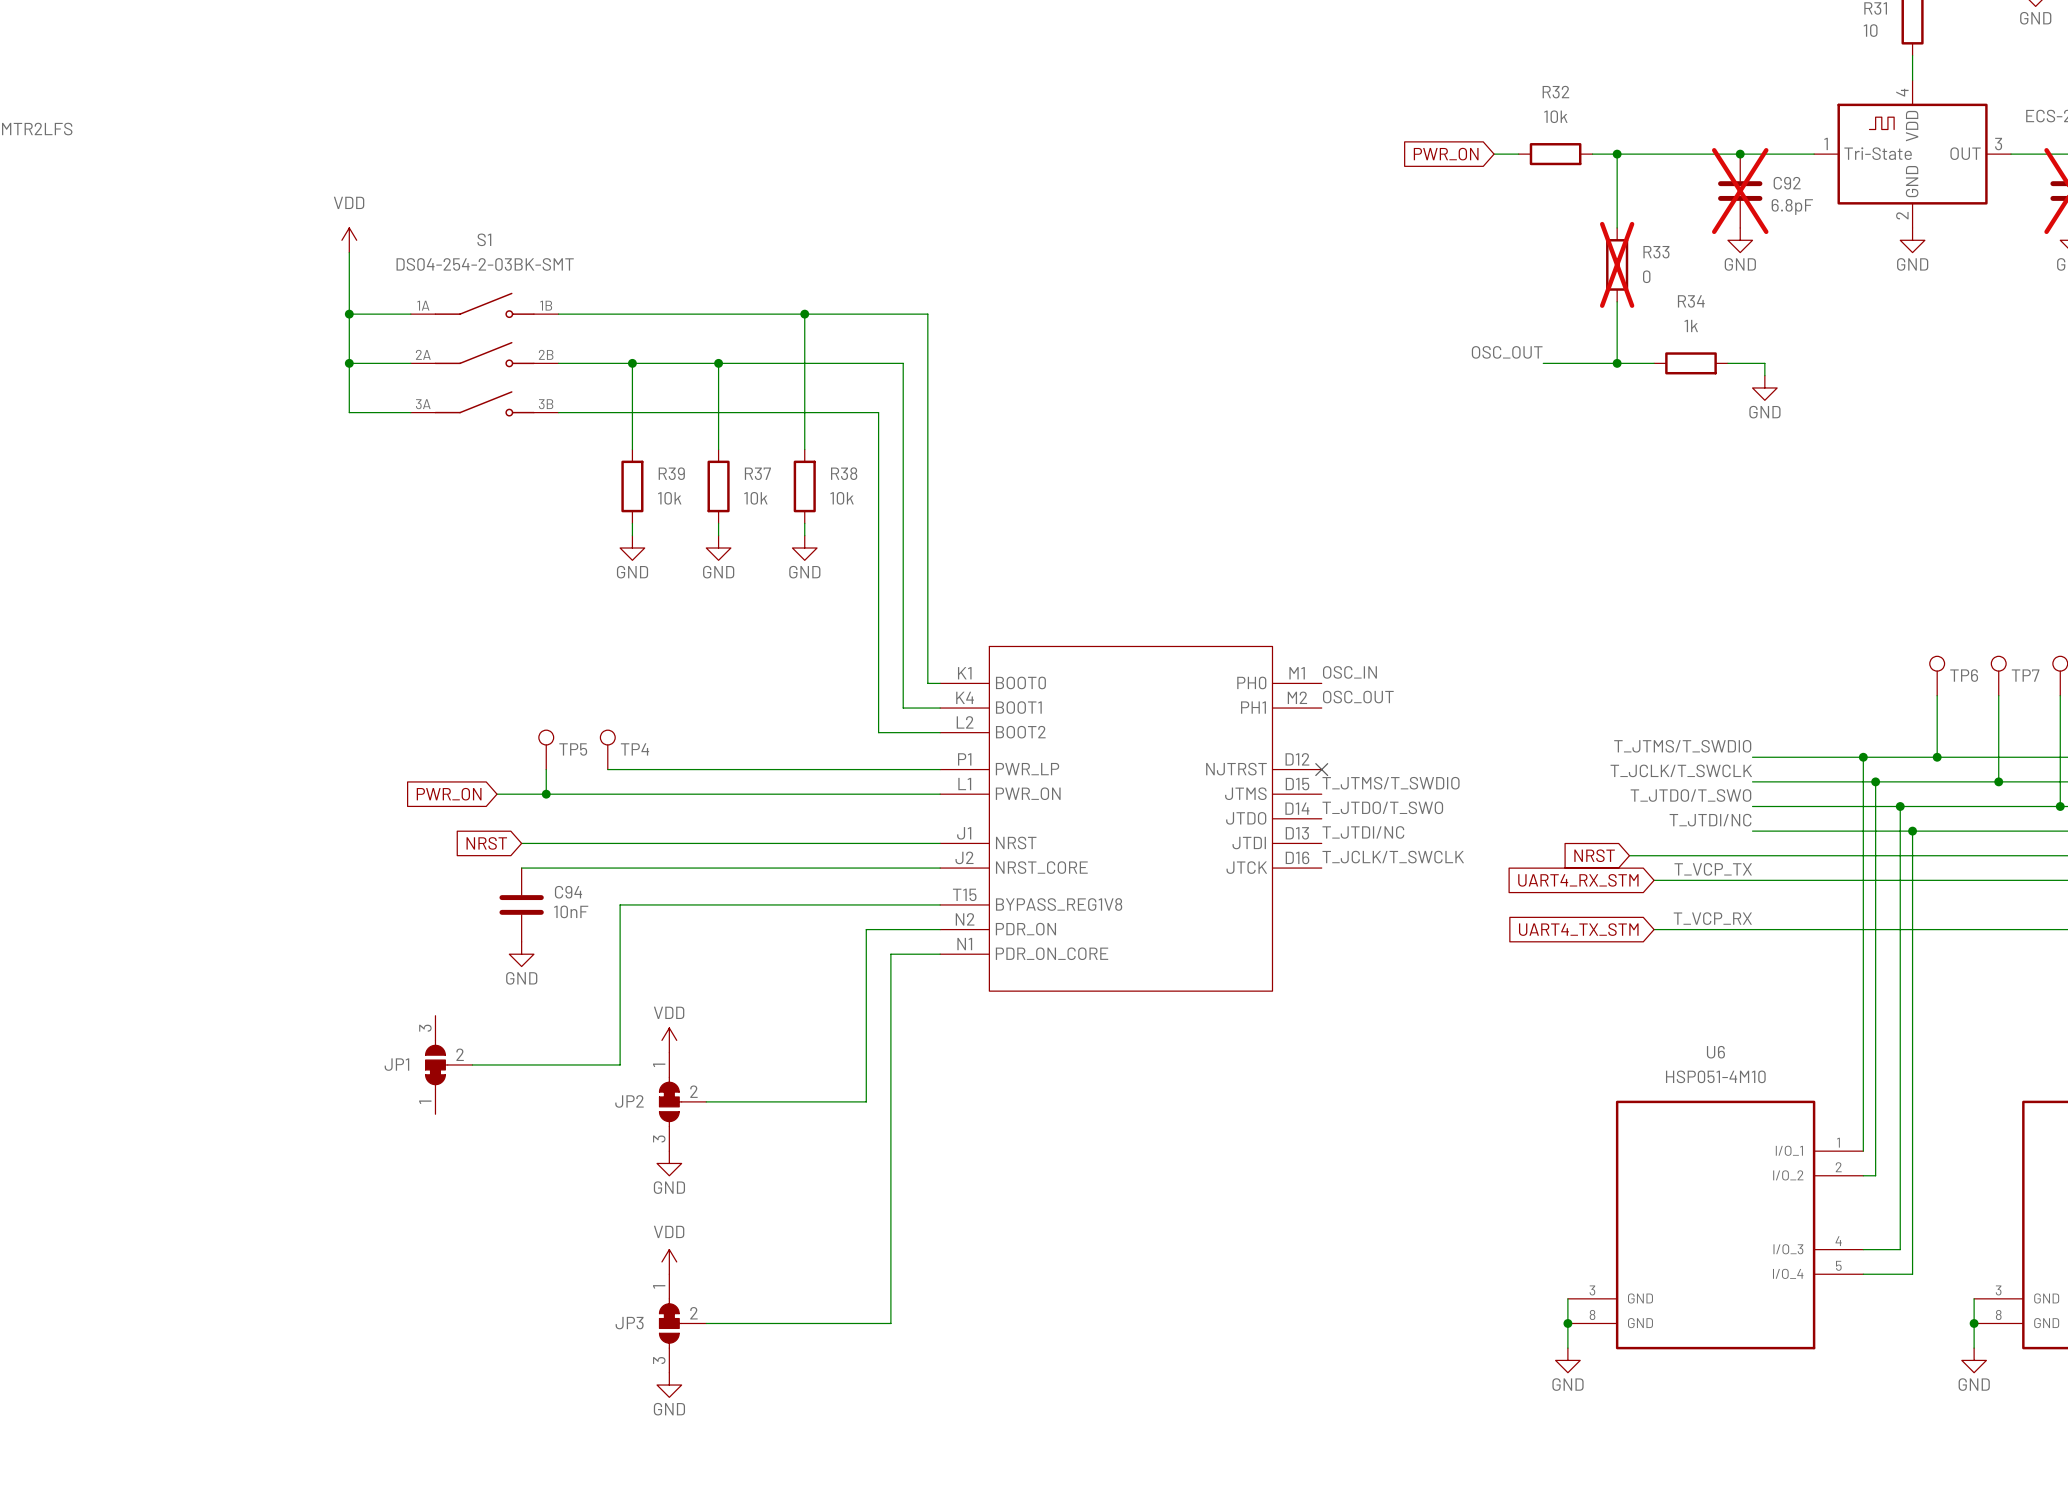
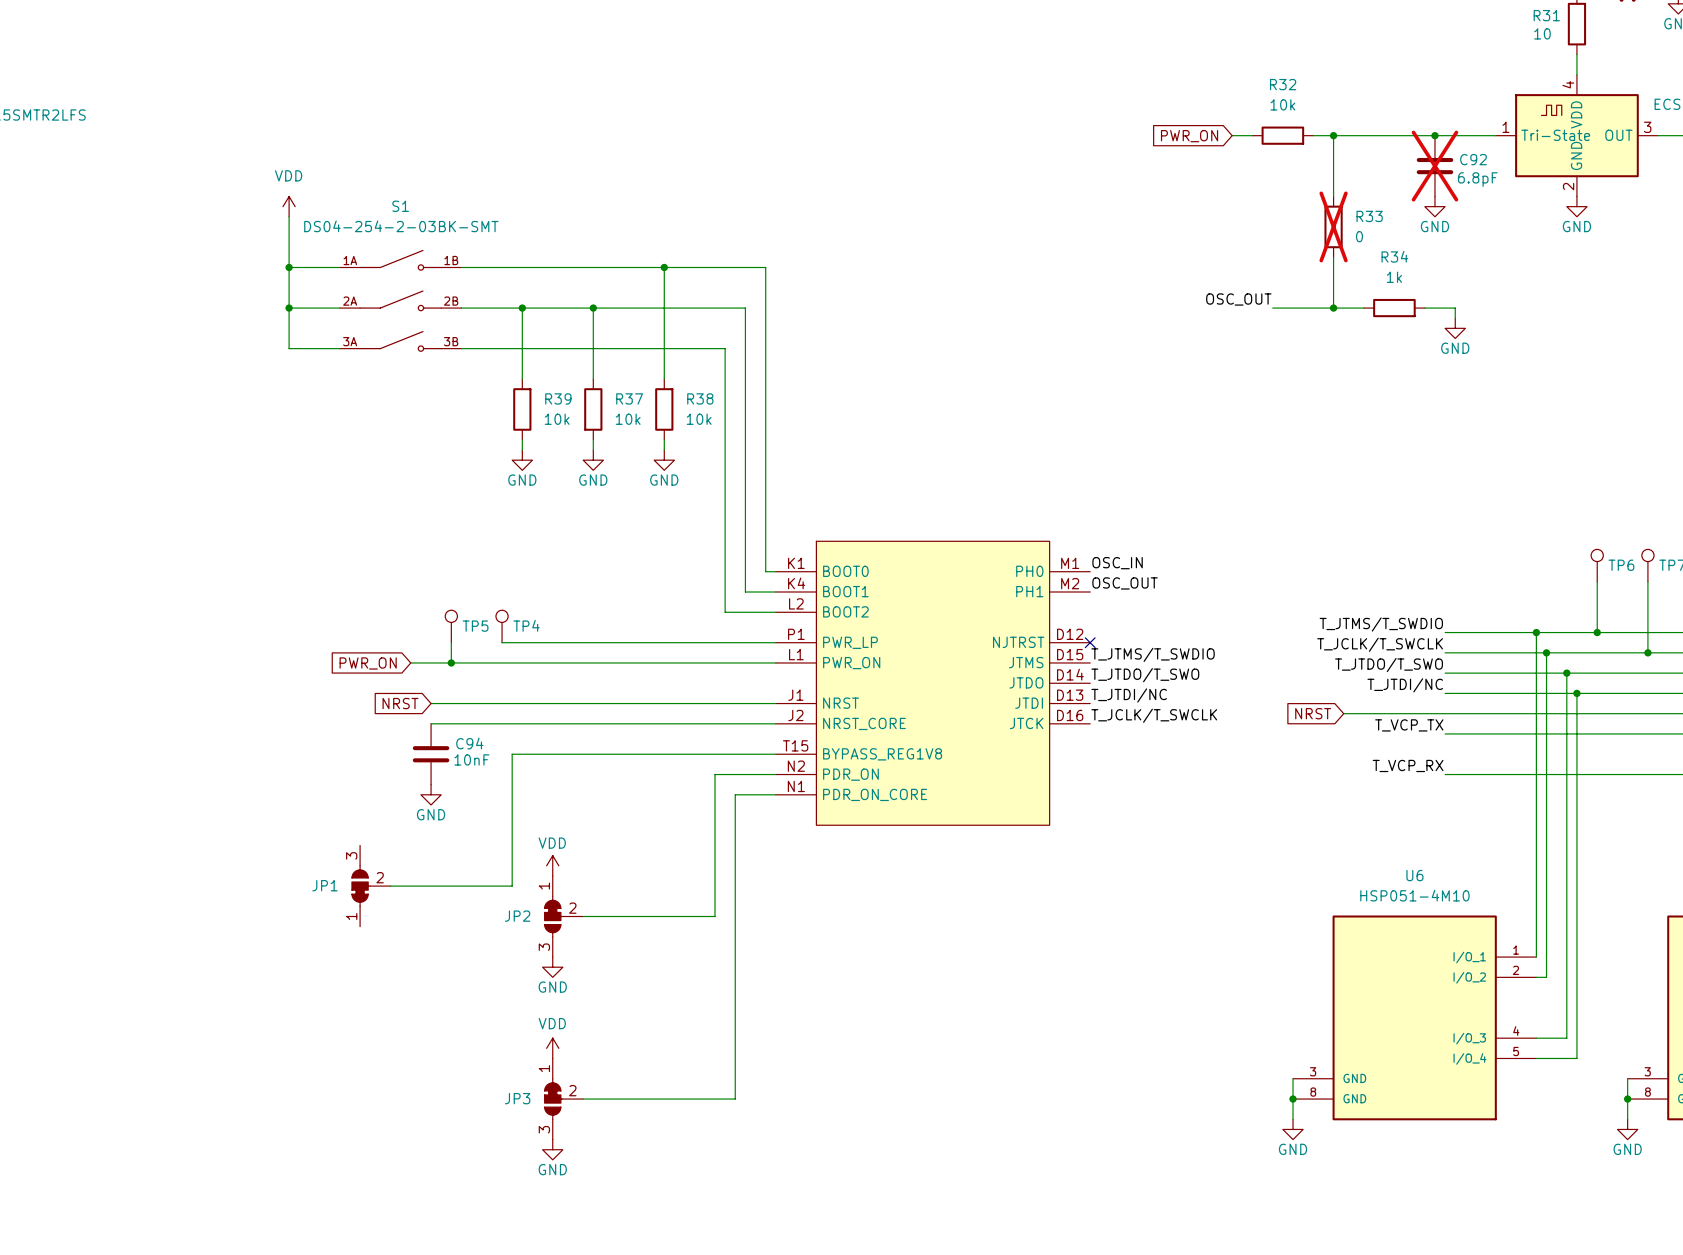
global label: UART4_RX_STM (1578, 880) -> none
wire: (1654, 880) (1752, 880) -> none
global label: UART4_TX_STM (1578, 929) -> none
wire: (1654, 929) (1752, 929) -> none

